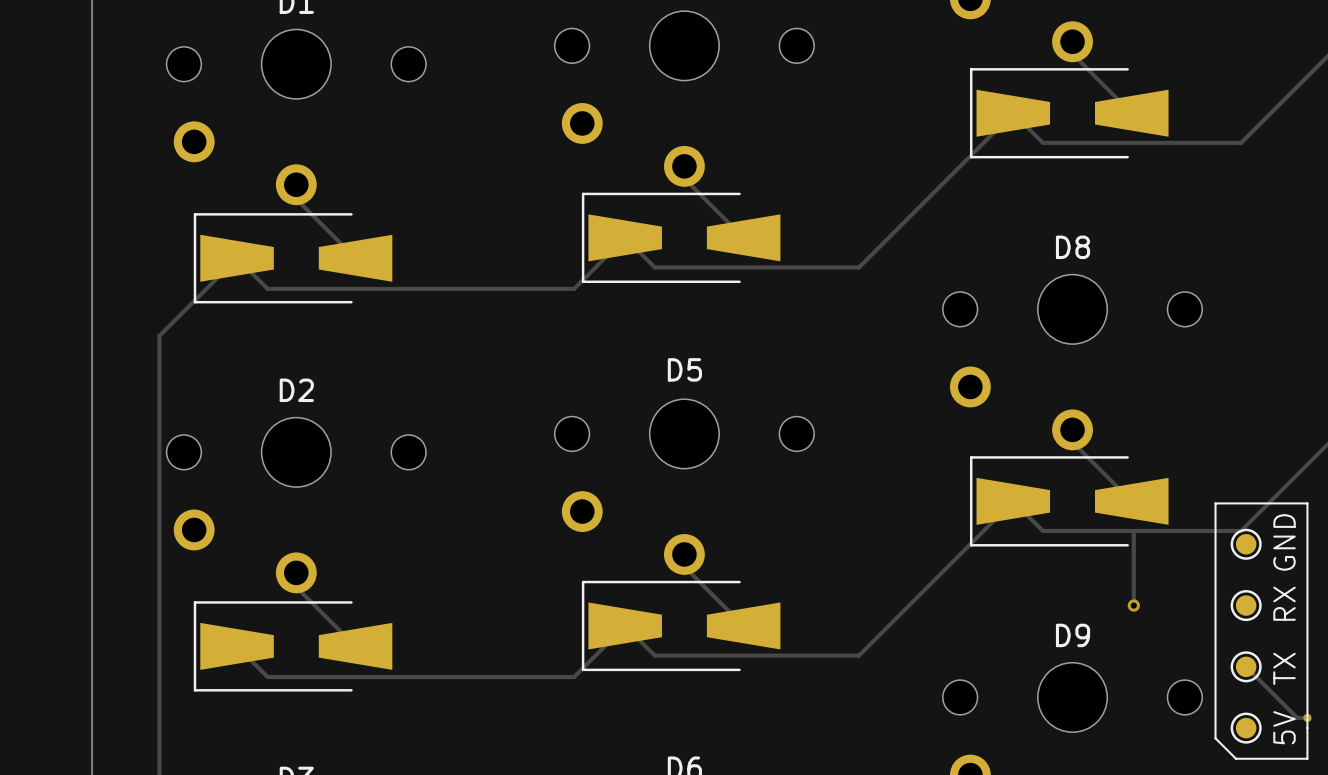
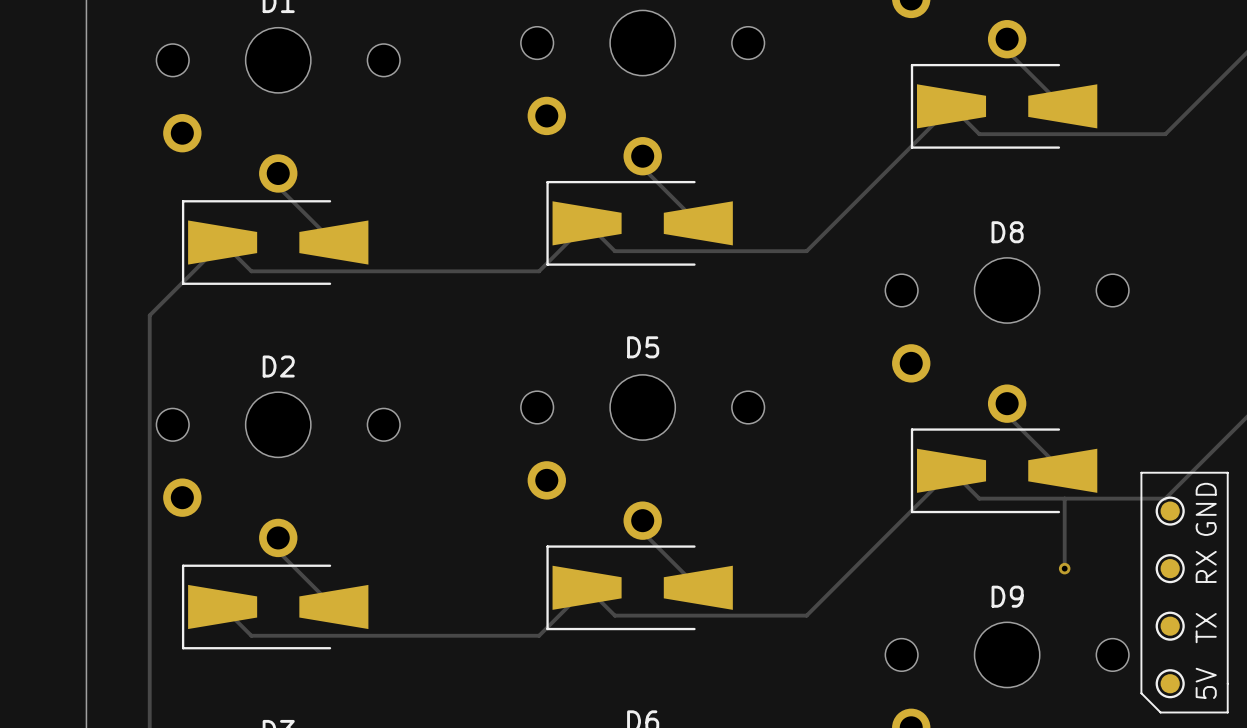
track: (1246, 666) (1297, 717) (1307, 717) -> none
via: (1307, 717) -> none

